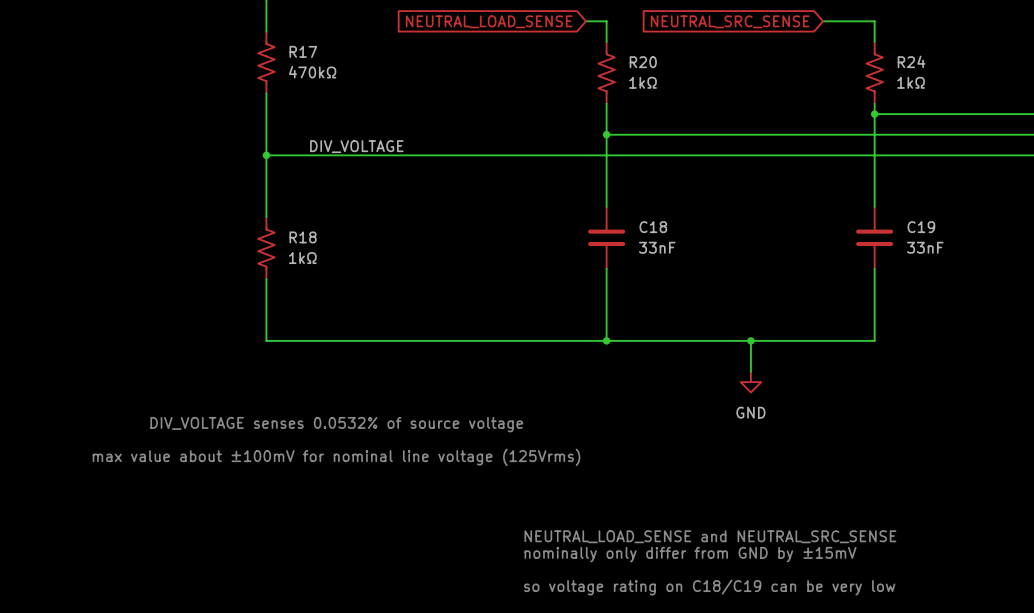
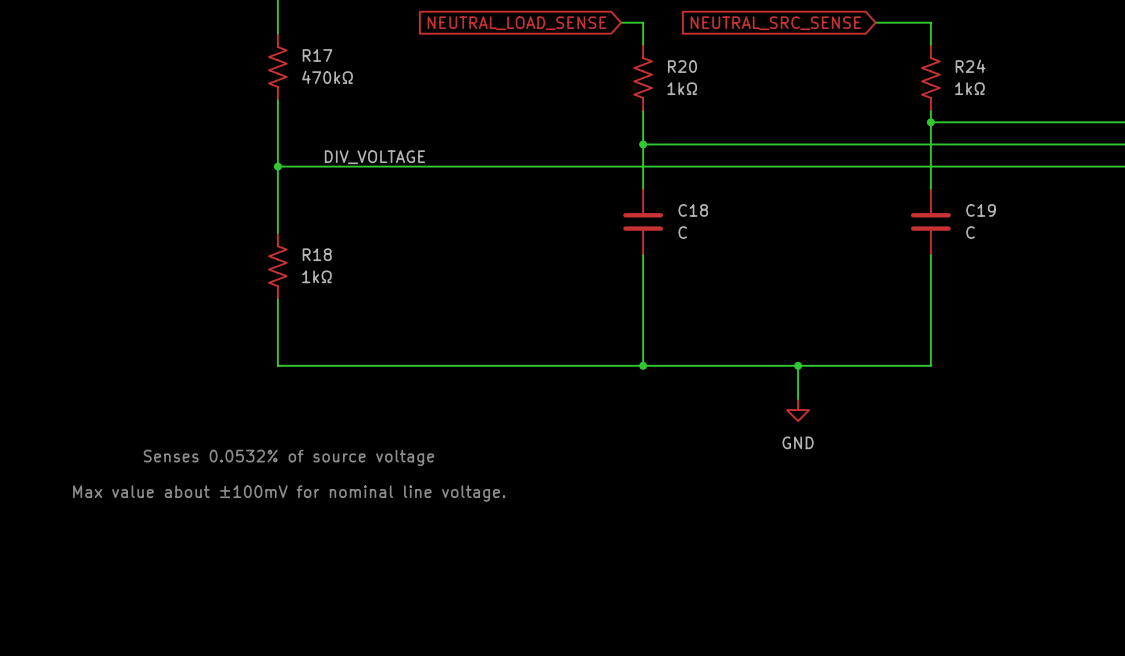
C18 position: (606, 237) -> (643, 221)
C19 position: (874, 237) -> (930, 221)
C18 value: 33nF (657, 247) -> C (682, 232)
C19 value: 33nF (925, 247) -> C (970, 232)
text: DIV_VOLTAGE senses 0.0532% of source voltage (336, 424) -> Senses 0.0532% of source voltage (288, 457)
text: max value about ±100mV for nominal line voltage (125Vrms) (336, 457) -> Max value about ±100mV for nominal line voltage. (289, 493)
text: NEUTRAL_LOAD_SENSE and NEUTRAL_SRC_SENSE (710, 536) -> none
text: nominally only differ from GND by ±15mV (690, 554) -> none
text: so voltage rating on C18/C19 can be very low (709, 587) -> none

